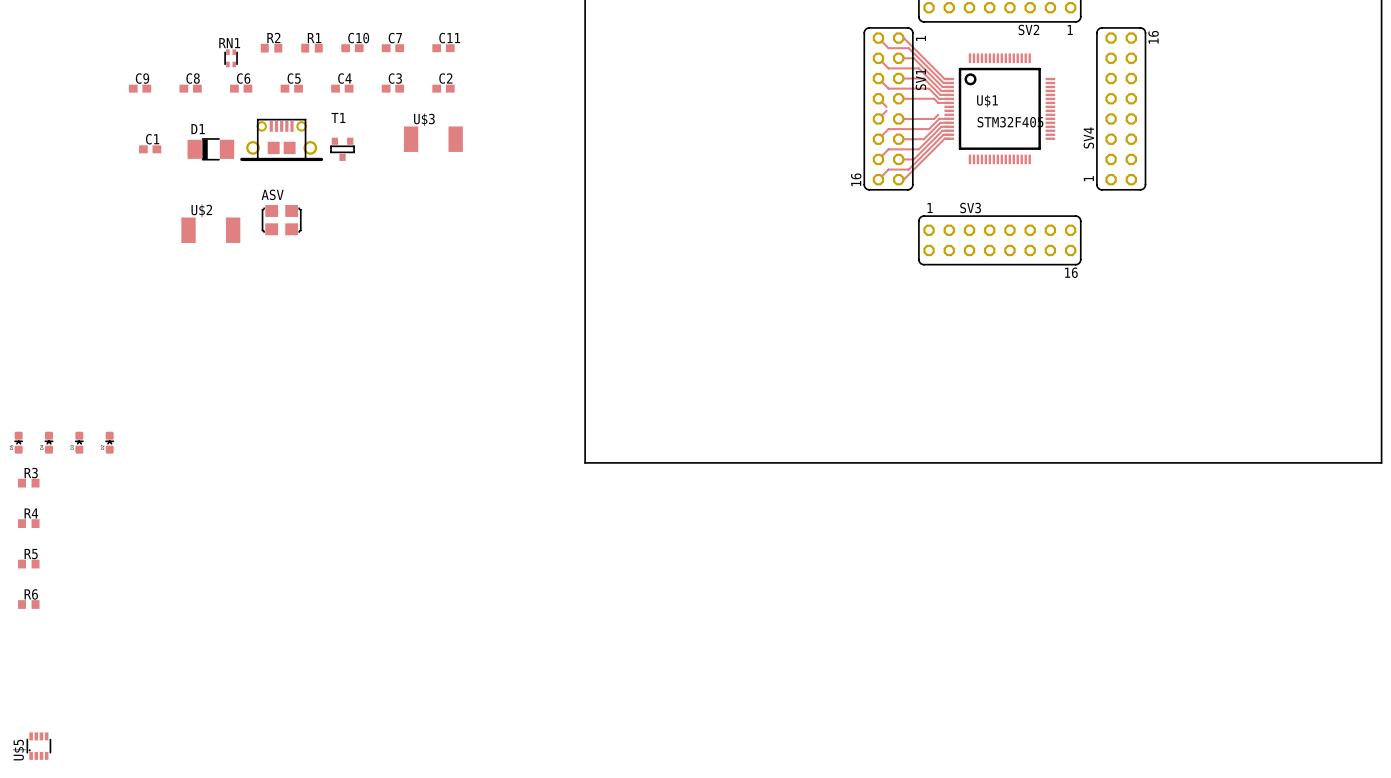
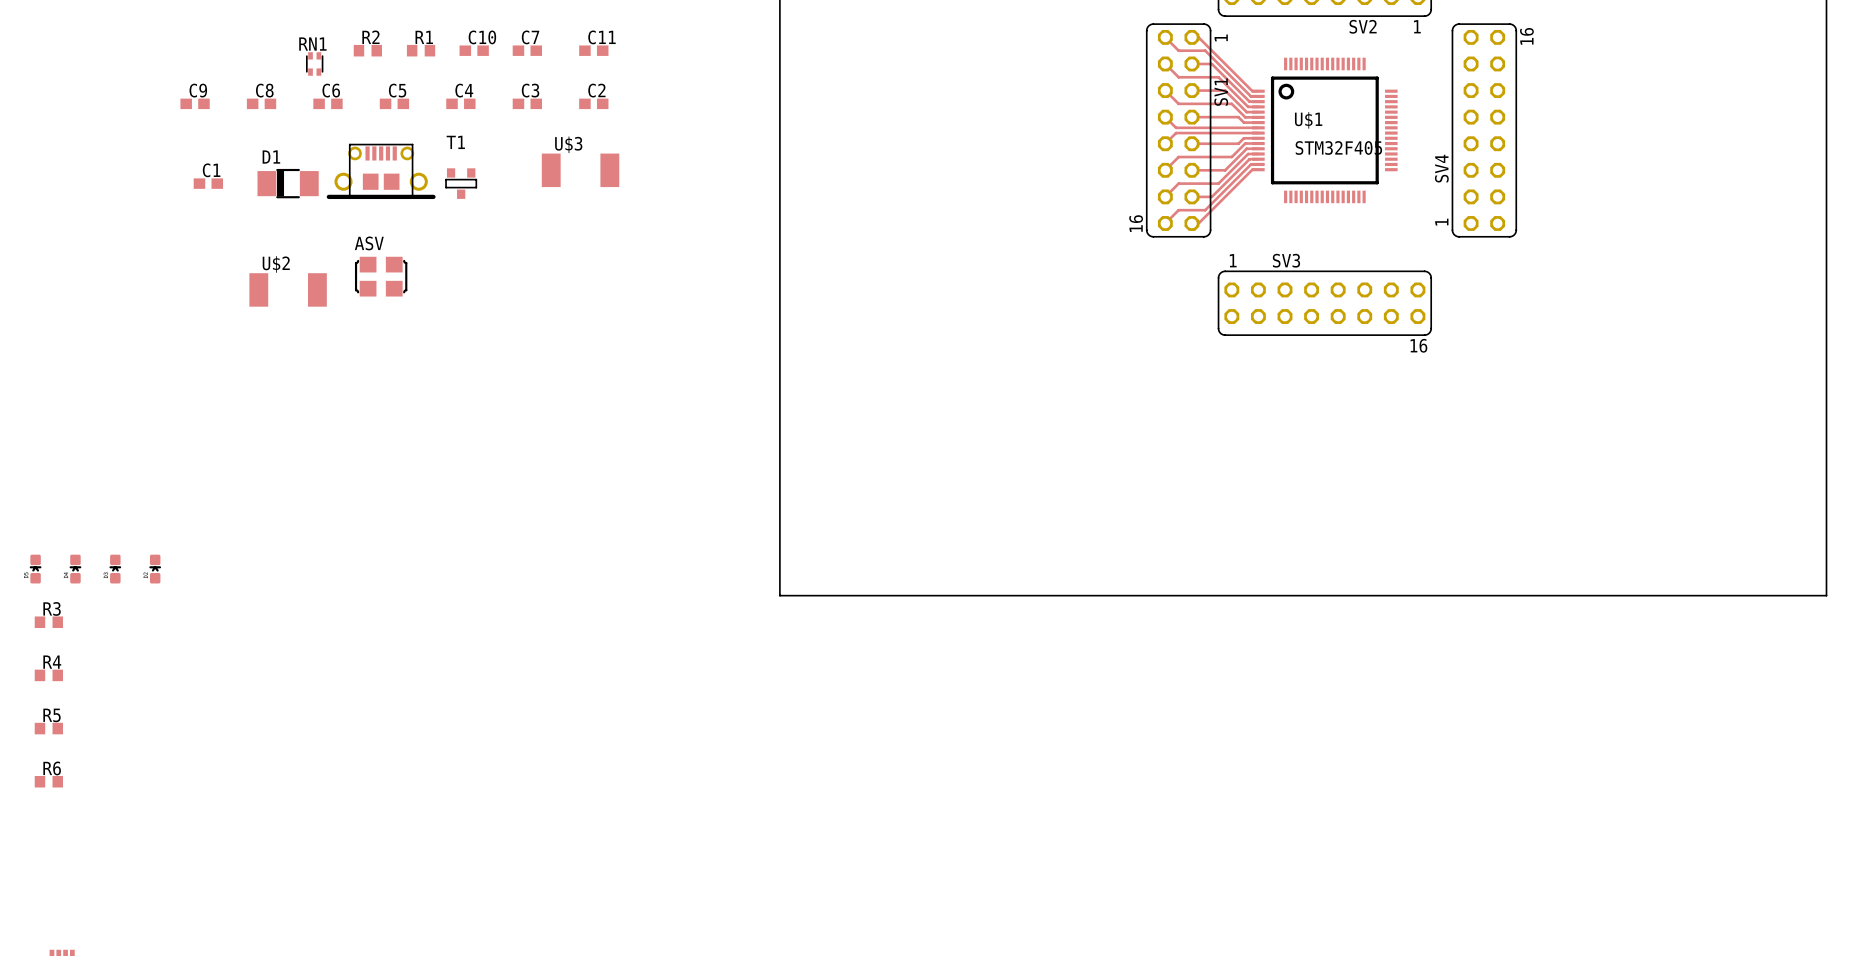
top track: none -> (1176, 127) (1258, 127)
top track: none -> (1176, 133) (1258, 133)
top track: none -> (1243, 138) (1258, 138)

